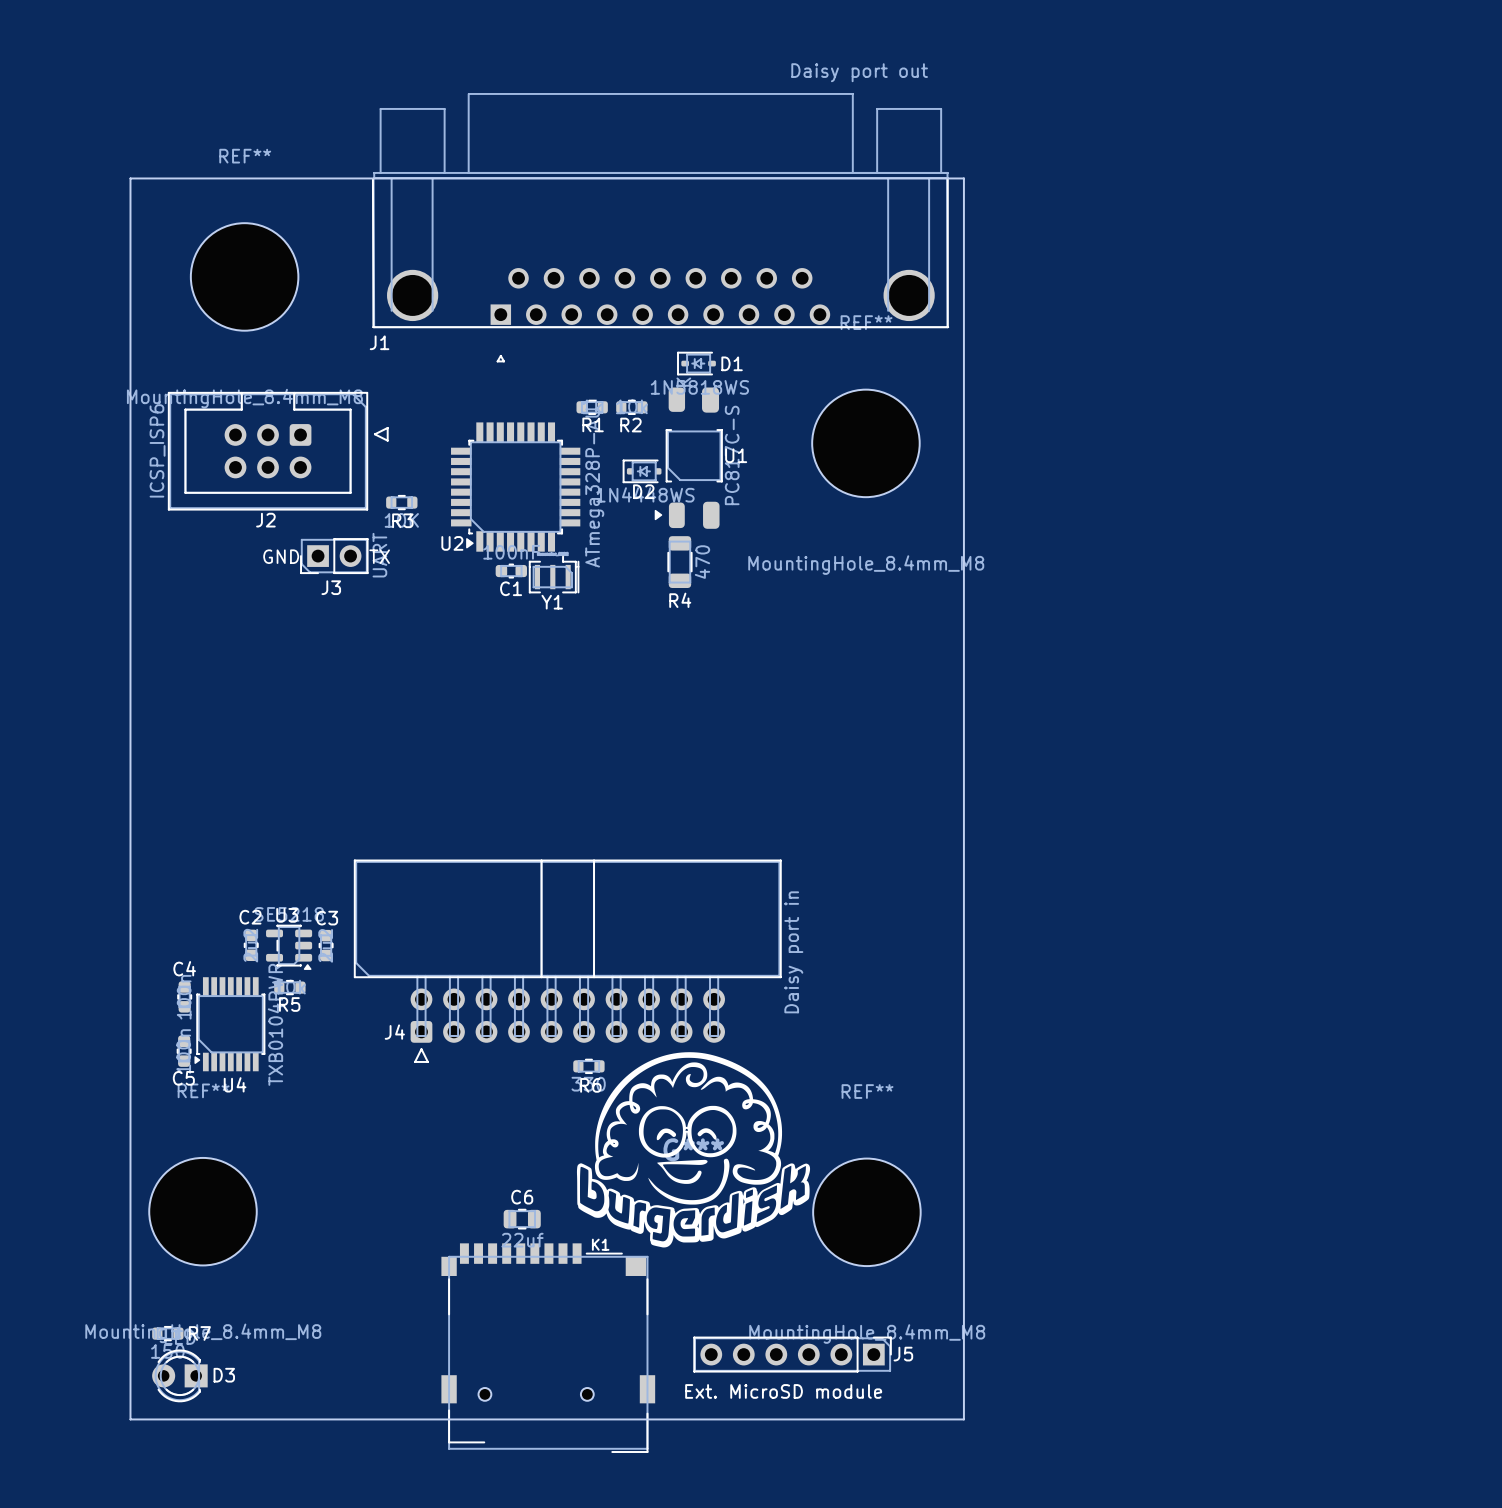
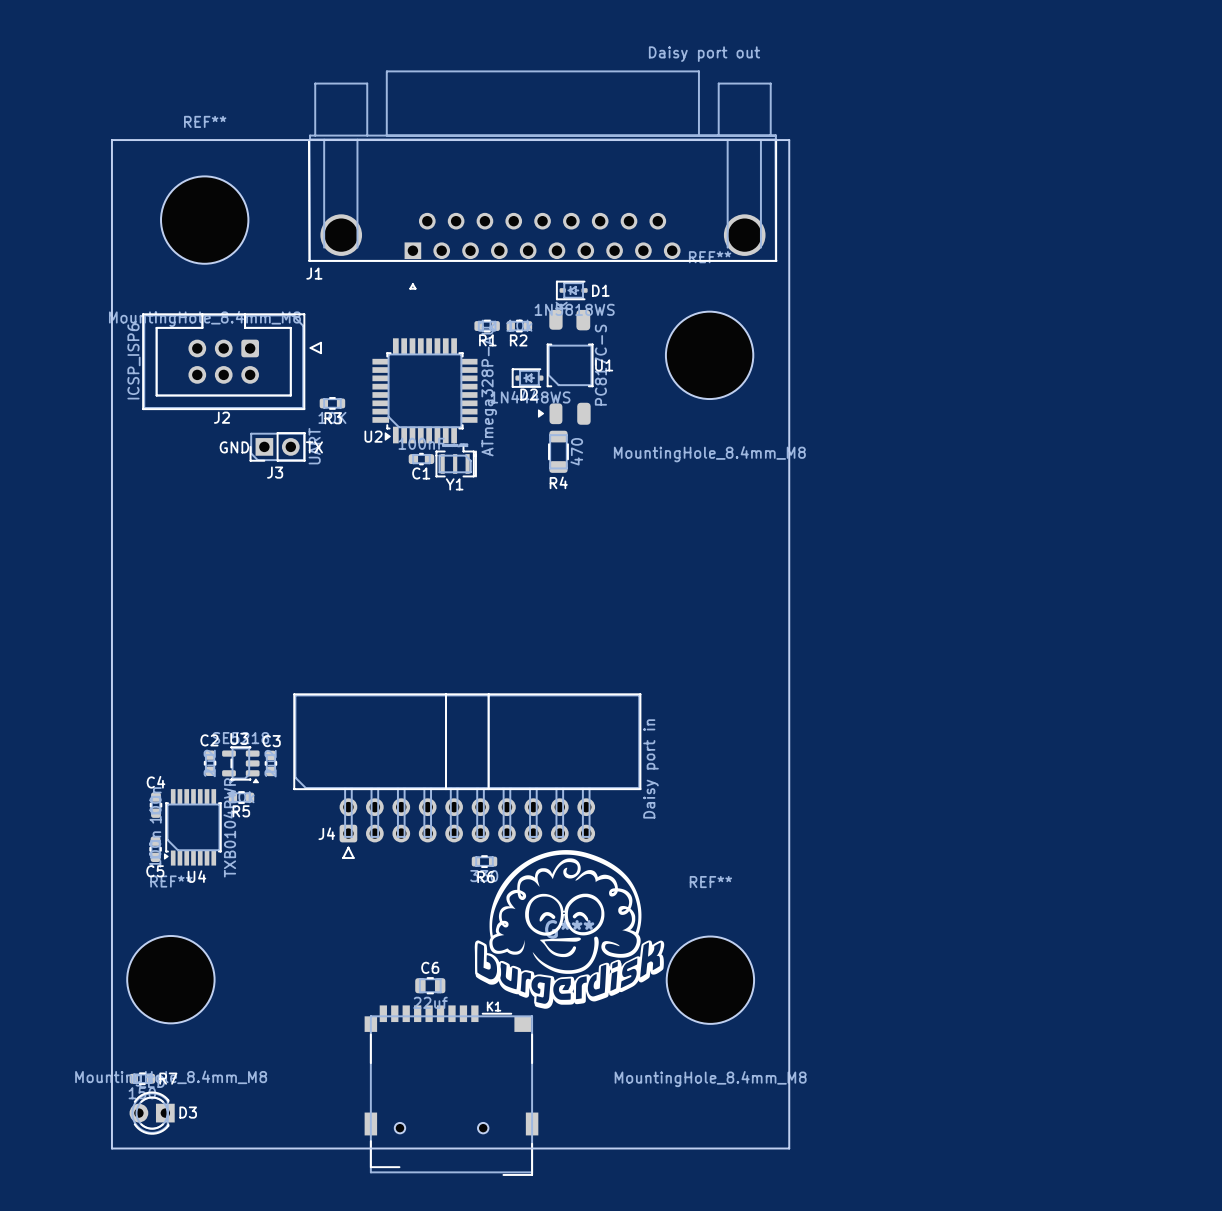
J5: Ext. MicroSD module (792, 1354) -> none

